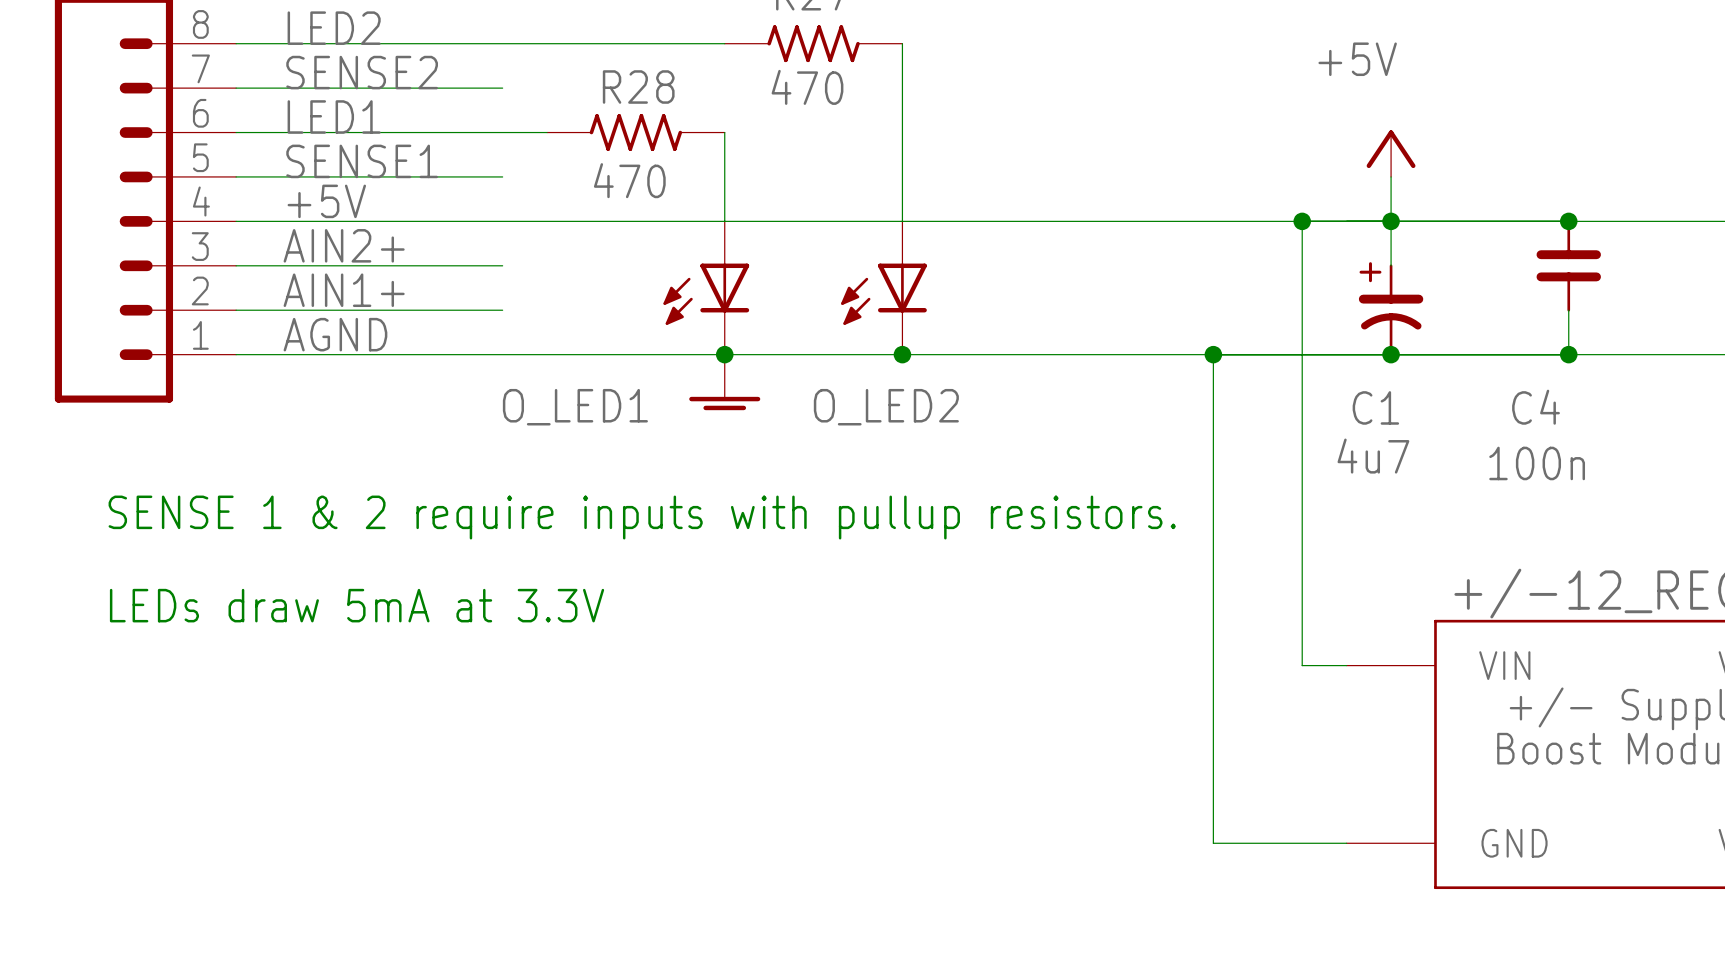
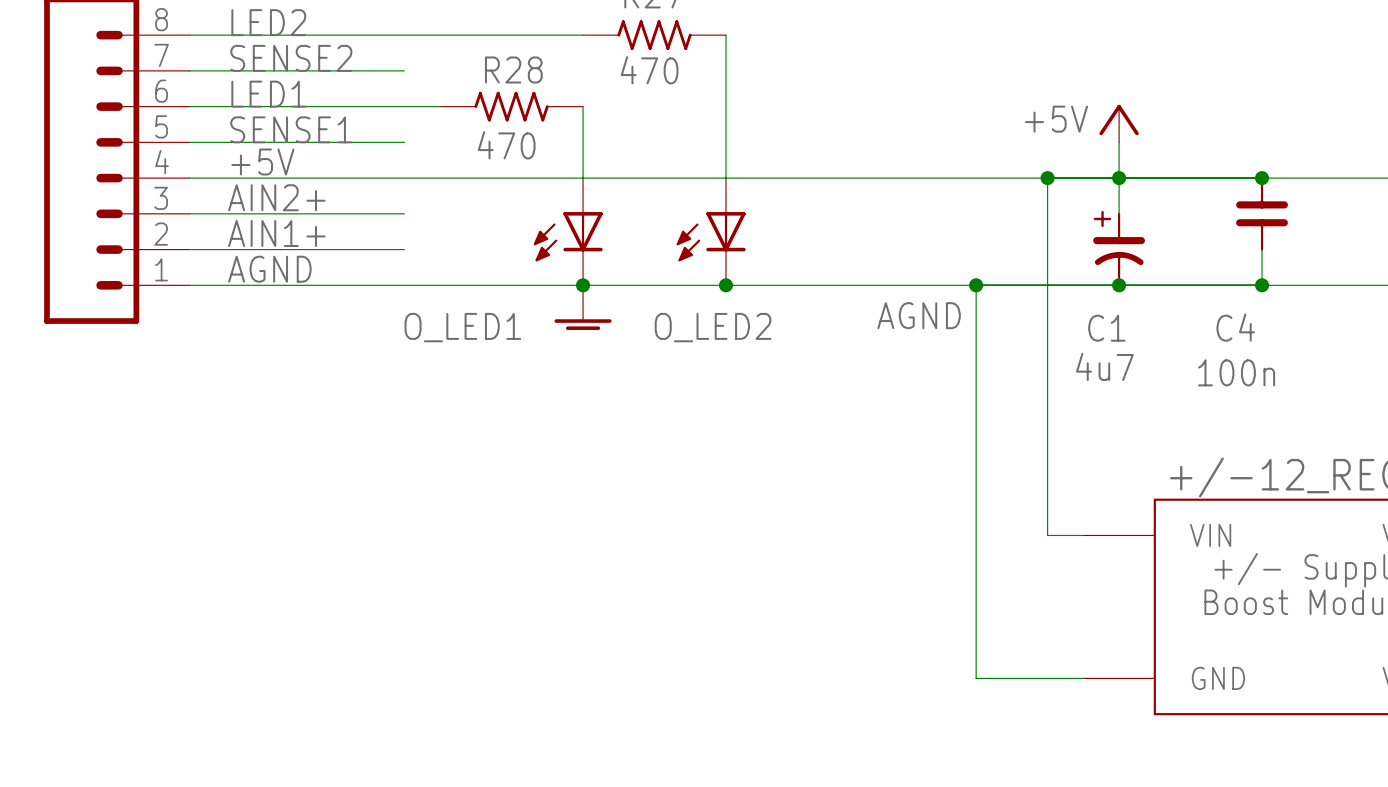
power symbol text position: +5V (1357, 59) -> +5V (1056, 119)
power symbol text: none -> AGND (919, 315)
text: SENSE 1 & 2 require inputs with pullup resistors. (642, 517) -> none
text: LEDs draw 5mA at 3.3V (357, 605) -> none

